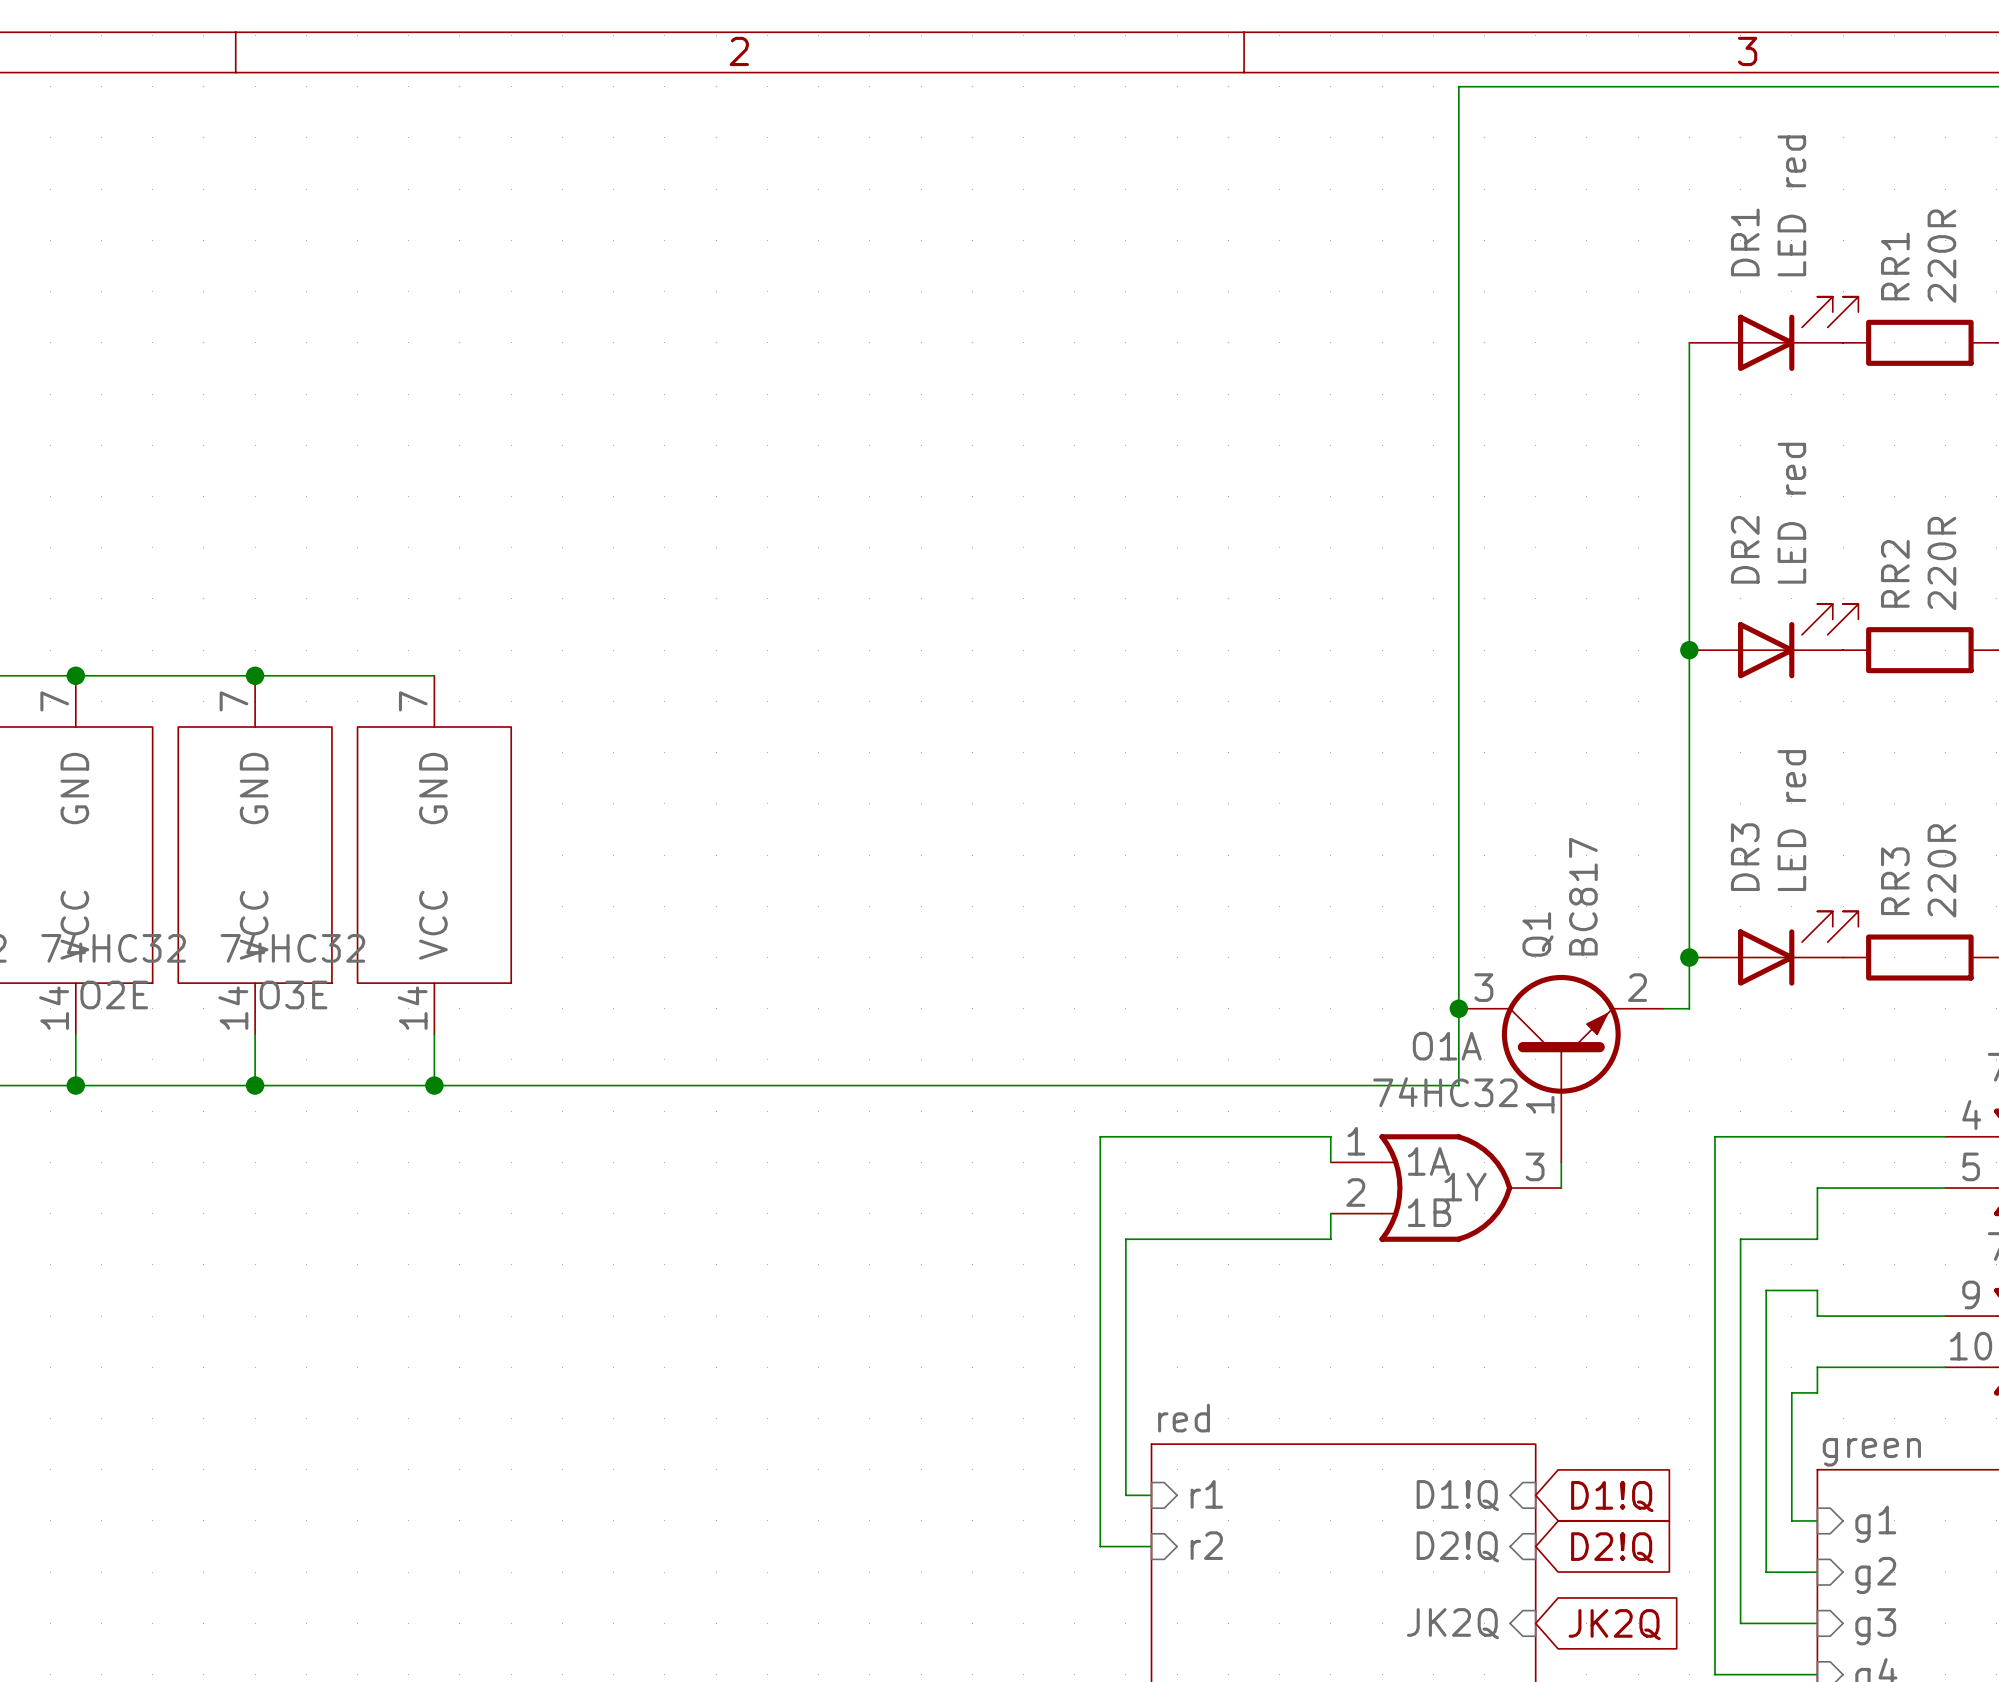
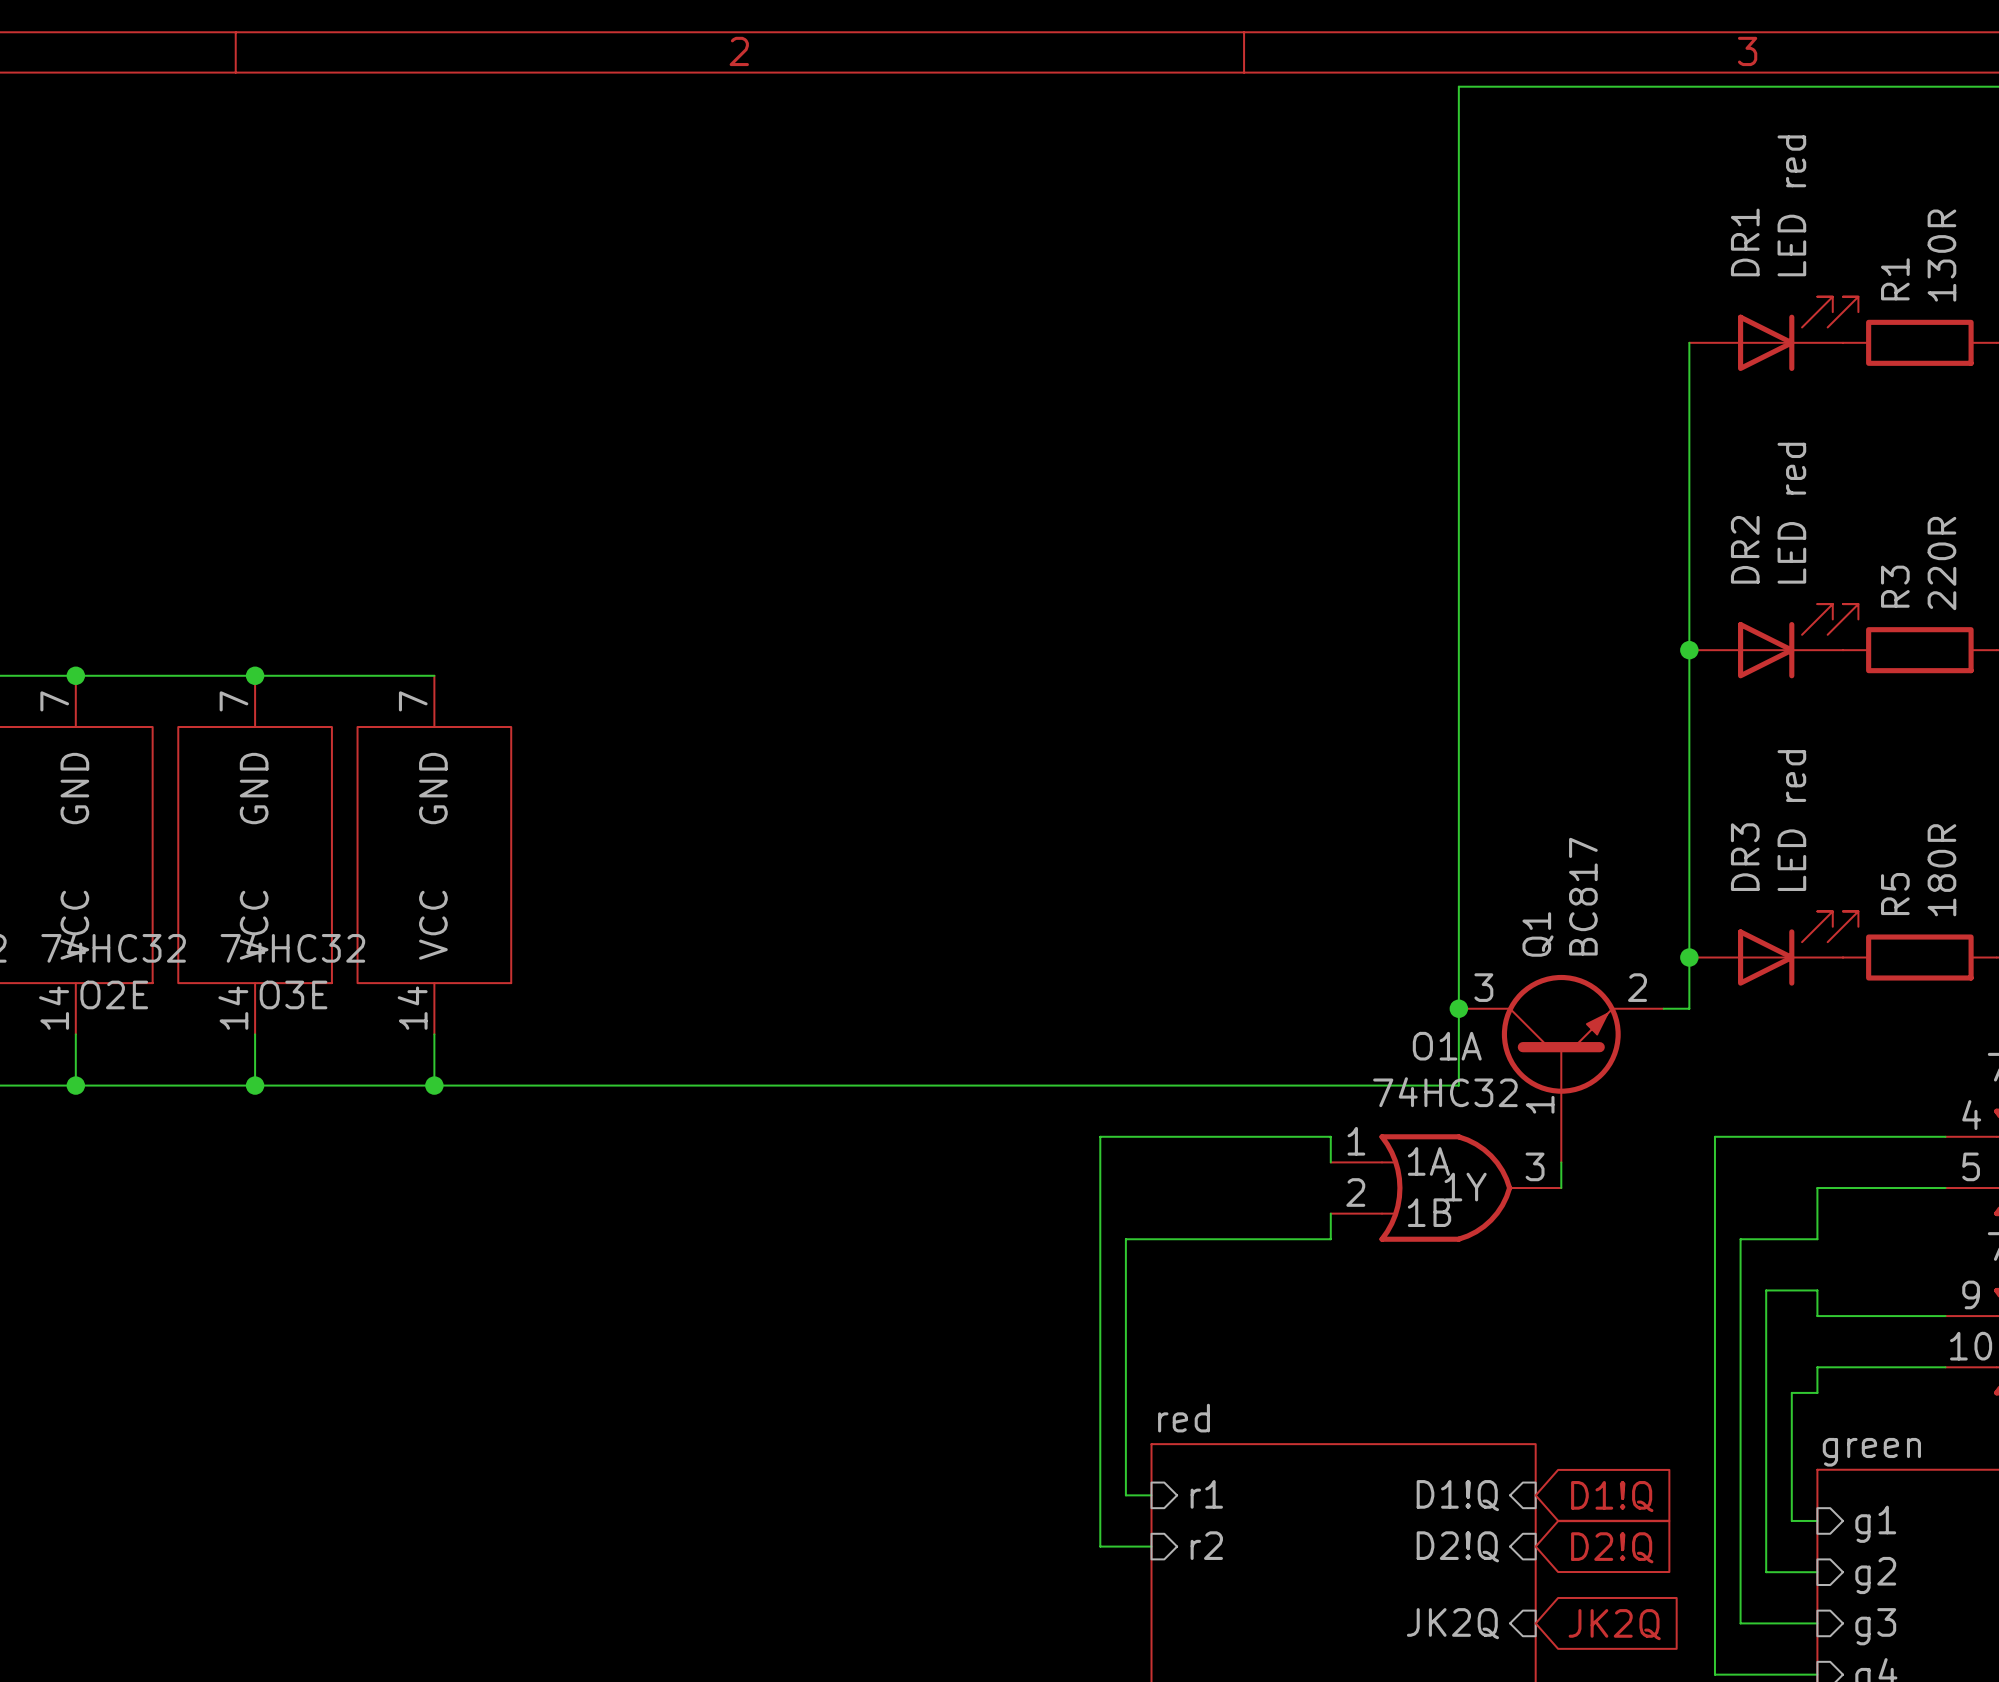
RR1 value: 220R (1941, 256) -> 130R (1941, 255)
RR1 name: RR1 (1895, 266) -> R1 (1895, 279)
RR2 name: RR2 (1895, 573) -> R3 (1895, 586)
RR3 value: 220R (1941, 870) -> 180R (1941, 870)
RR3 name: RR3 (1895, 881) -> R5 (1895, 894)

